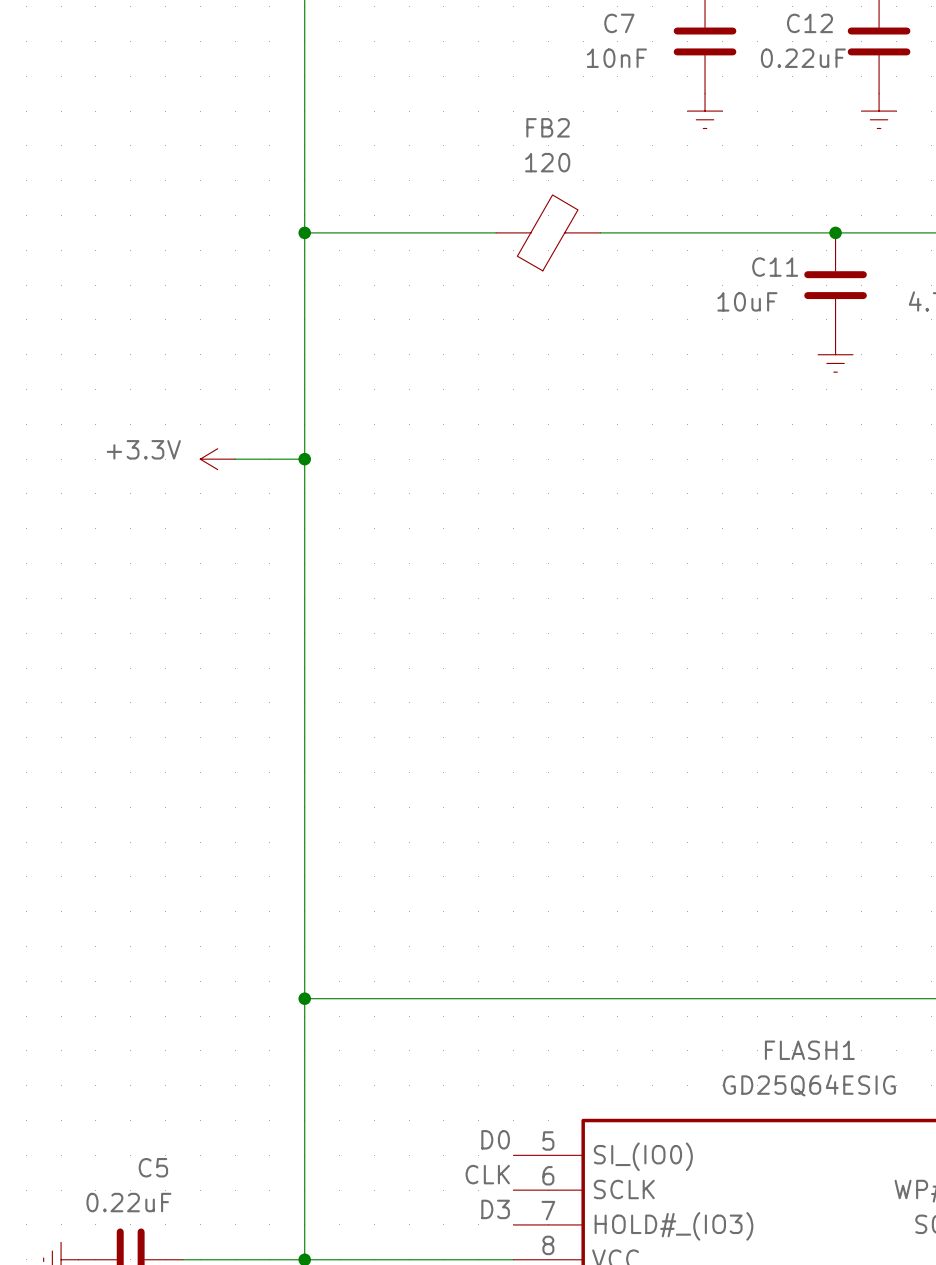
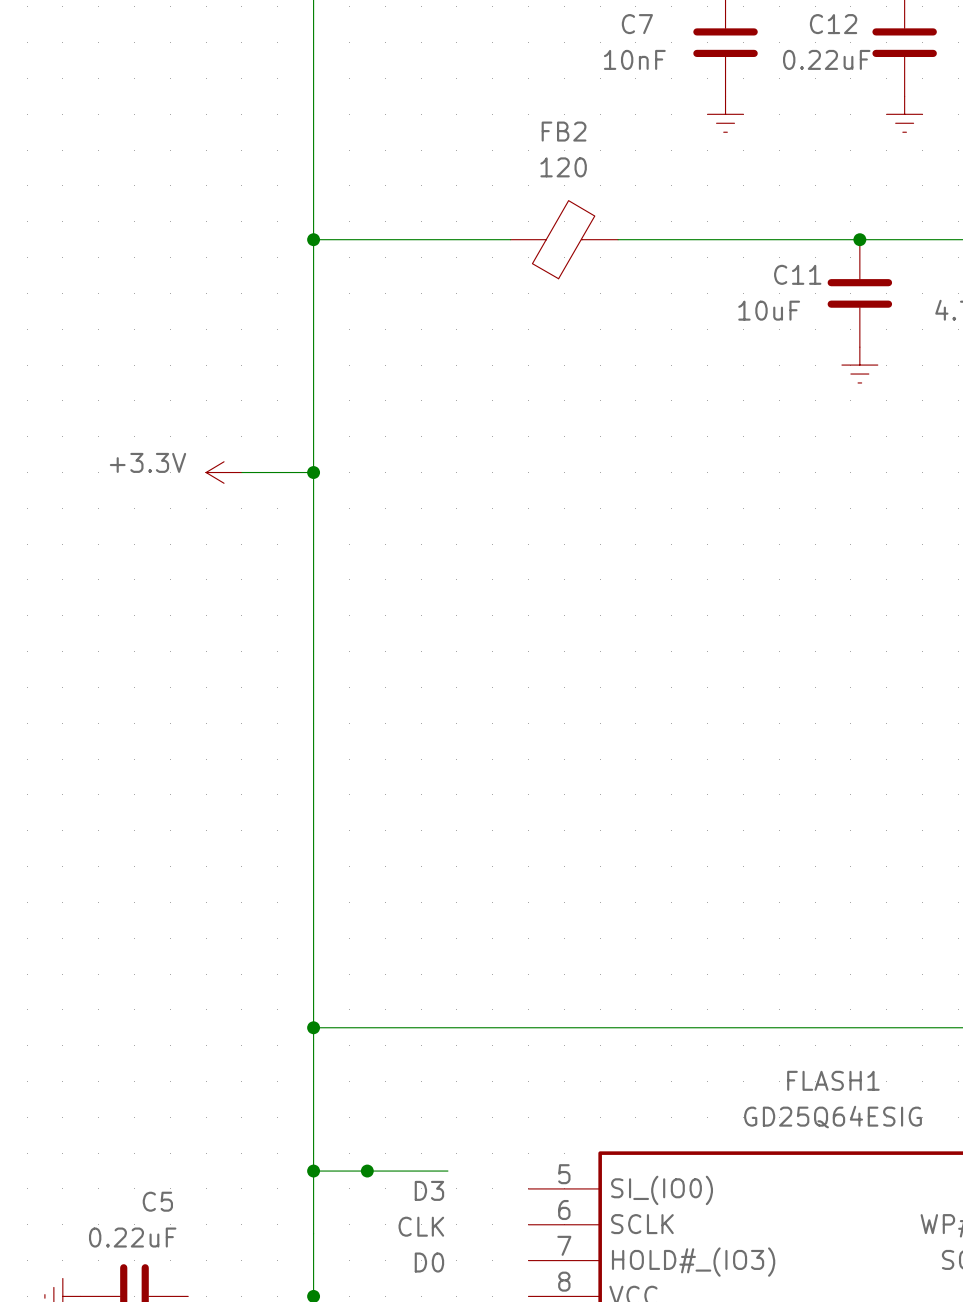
wire: none -> (313, 1171) (447, 1171)
junction: none -> (313, 1171)
junction: none -> (367, 1171)
label position: D0 (495, 1139) -> D0 (429, 1262)
label position: CLK (487, 1174) -> CLK (421, 1226)
label position: D3 (495, 1209) -> D3 (429, 1190)
wire: (182, 1259) (513, 1259) -> none

